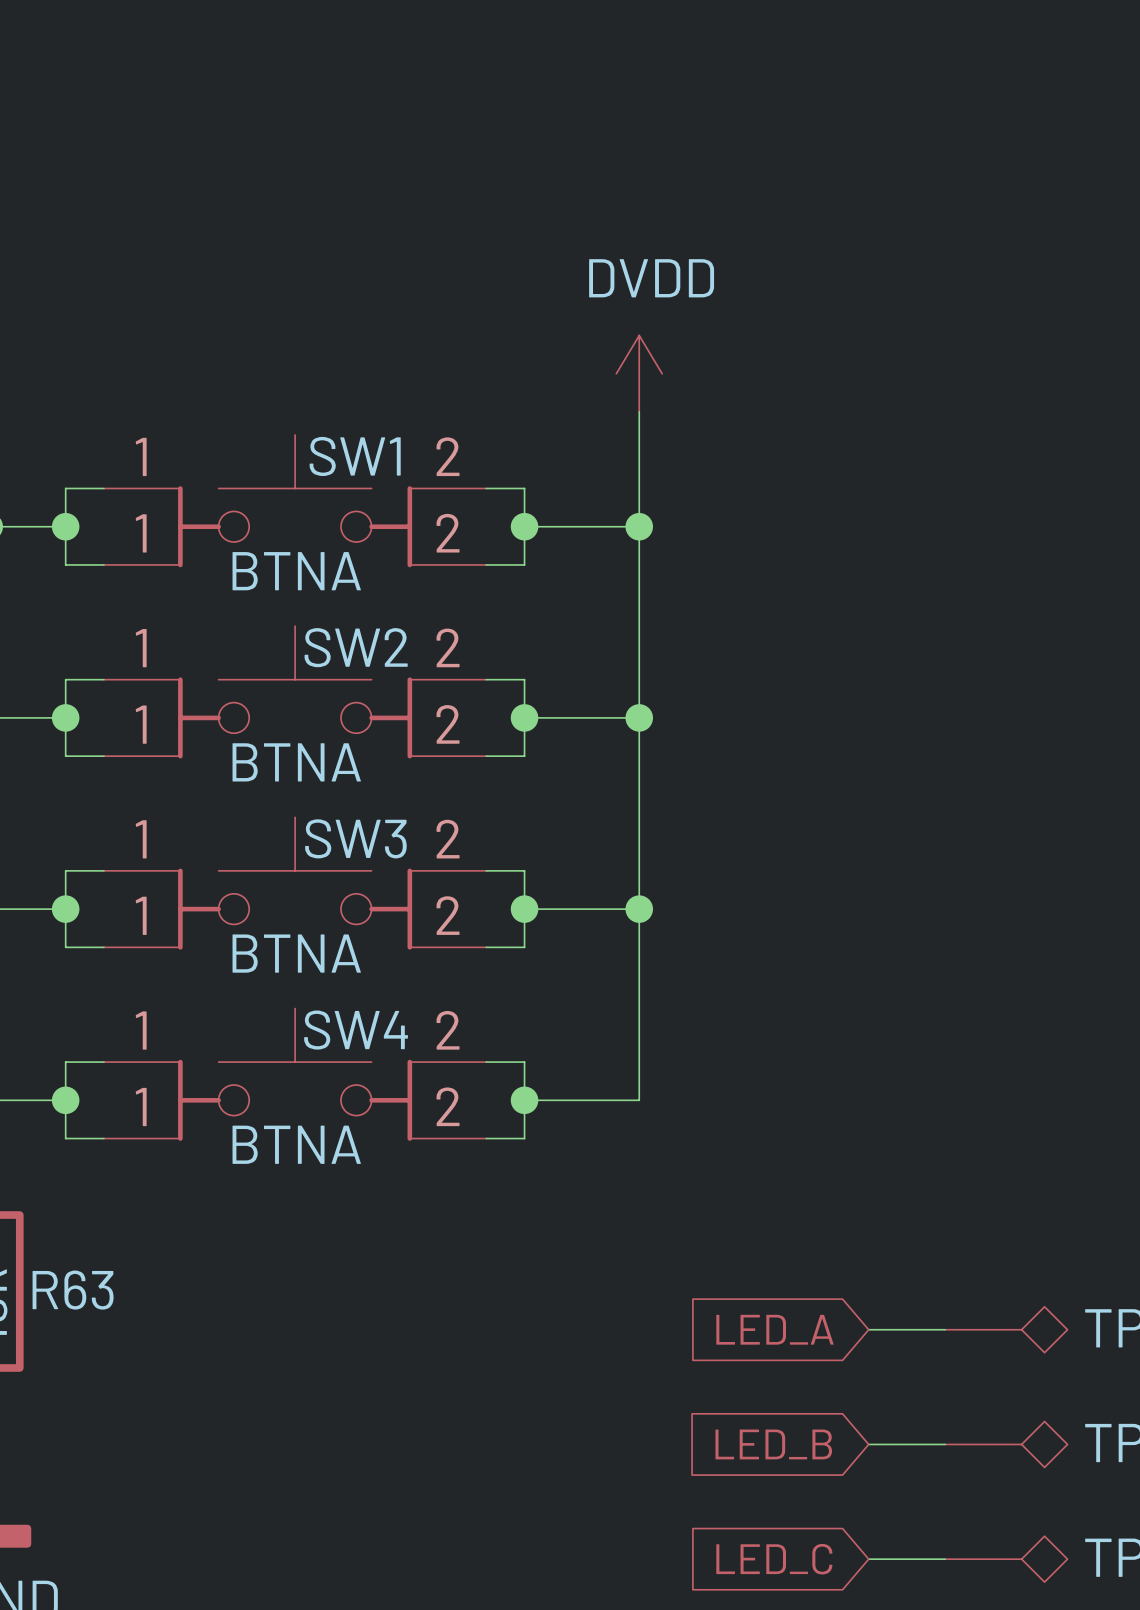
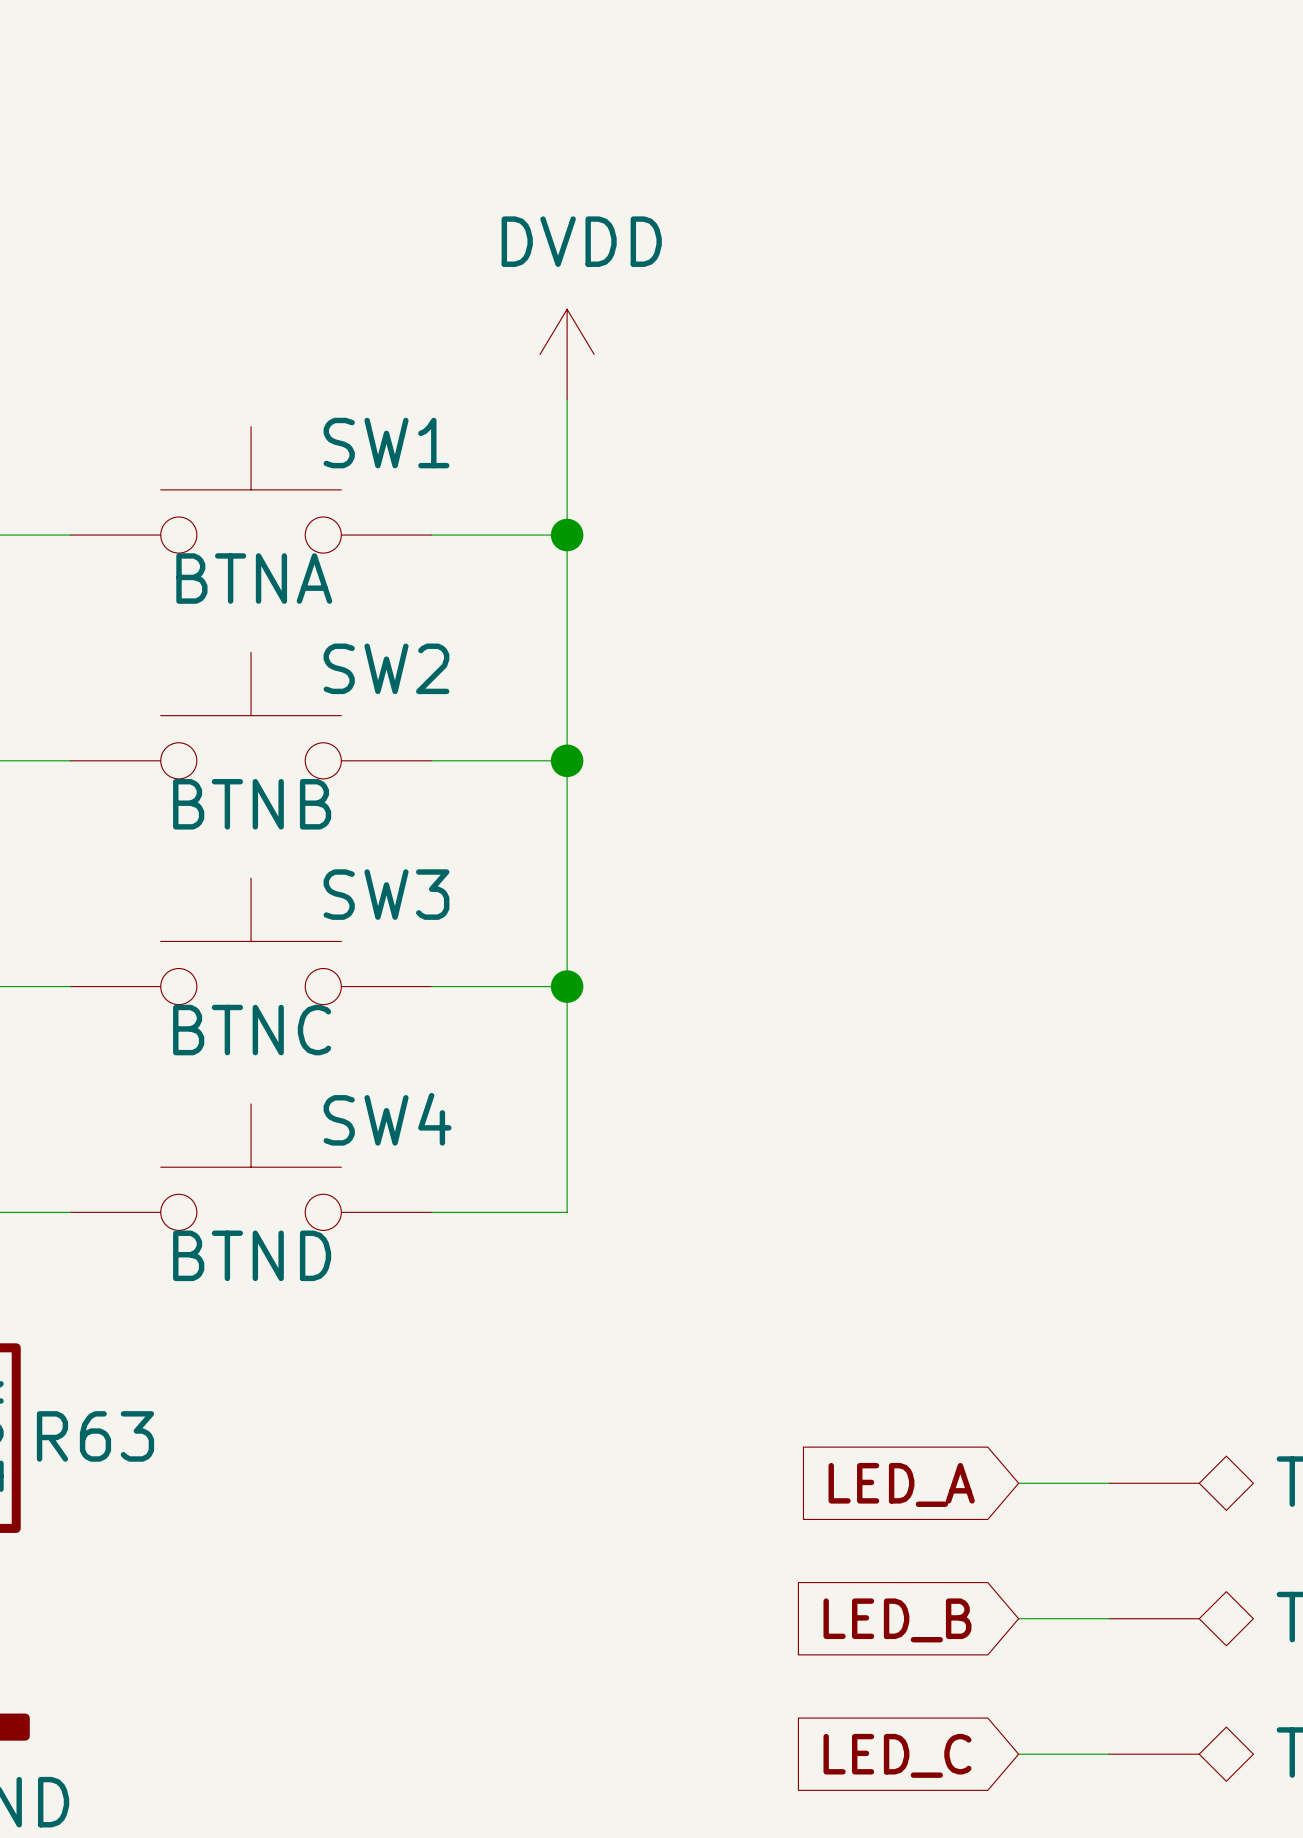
power symbol position: DVDD (639, 373) -> DVDD (567, 354)
wire: (639, 412) (639, 1100) (524, 1100) -> (567, 399) (567, 1212) (431, 1212)
SW1 symbol: [103, 434, 487, 568] -> [70, 426, 432, 554]
wire: (103, 488) (65, 488) (65, 564) (103, 564) -> none
wire: (486, 488) (524, 488) (524, 564) (486, 564) -> none
junction: (65, 526) -> none
wire: (524, 526) (639, 526) -> (431, 535) (567, 535)
junction position: (524, 526) -> (567, 535)
junction: (639, 526) -> none
SW2 symbol: [103, 626, 487, 759] -> [70, 652, 432, 779]
wire: (103, 679) (65, 679) (65, 756) (103, 756) -> none
wire: (486, 679) (524, 679) (524, 756) (486, 756) -> none
junction: (65, 717) -> none
wire: (524, 717) (639, 717) -> (431, 760) (567, 760)
junction position: (524, 717) -> (567, 760)
junction: (639, 717) -> none
SW2 value: BTNA (296, 762) -> BTNB (252, 804)
SW3 symbol: [103, 817, 487, 950] -> [70, 878, 432, 1005]
wire: (103, 870) (65, 870) (65, 947) (103, 947) -> none
wire: (486, 870) (524, 870) (524, 947) (486, 947) -> none
junction: (65, 909) -> none
wire: (524, 909) (639, 909) -> (431, 986) (567, 986)
junction position: (524, 909) -> (567, 986)
junction: (639, 909) -> none
SW3 value: BTNA (296, 953) -> BTNC (252, 1030)
SW4 symbol: [103, 1008, 487, 1141] -> [70, 1103, 432, 1231]
wire: (103, 1062) (65, 1062) (65, 1138) (103, 1138) -> none
wire: (486, 1062) (524, 1062) (524, 1138) (486, 1138) -> none
junction: (65, 1100) -> none
junction: (524, 1100) -> none
SW4 value: BTNA (296, 1144) -> BTND (252, 1255)

